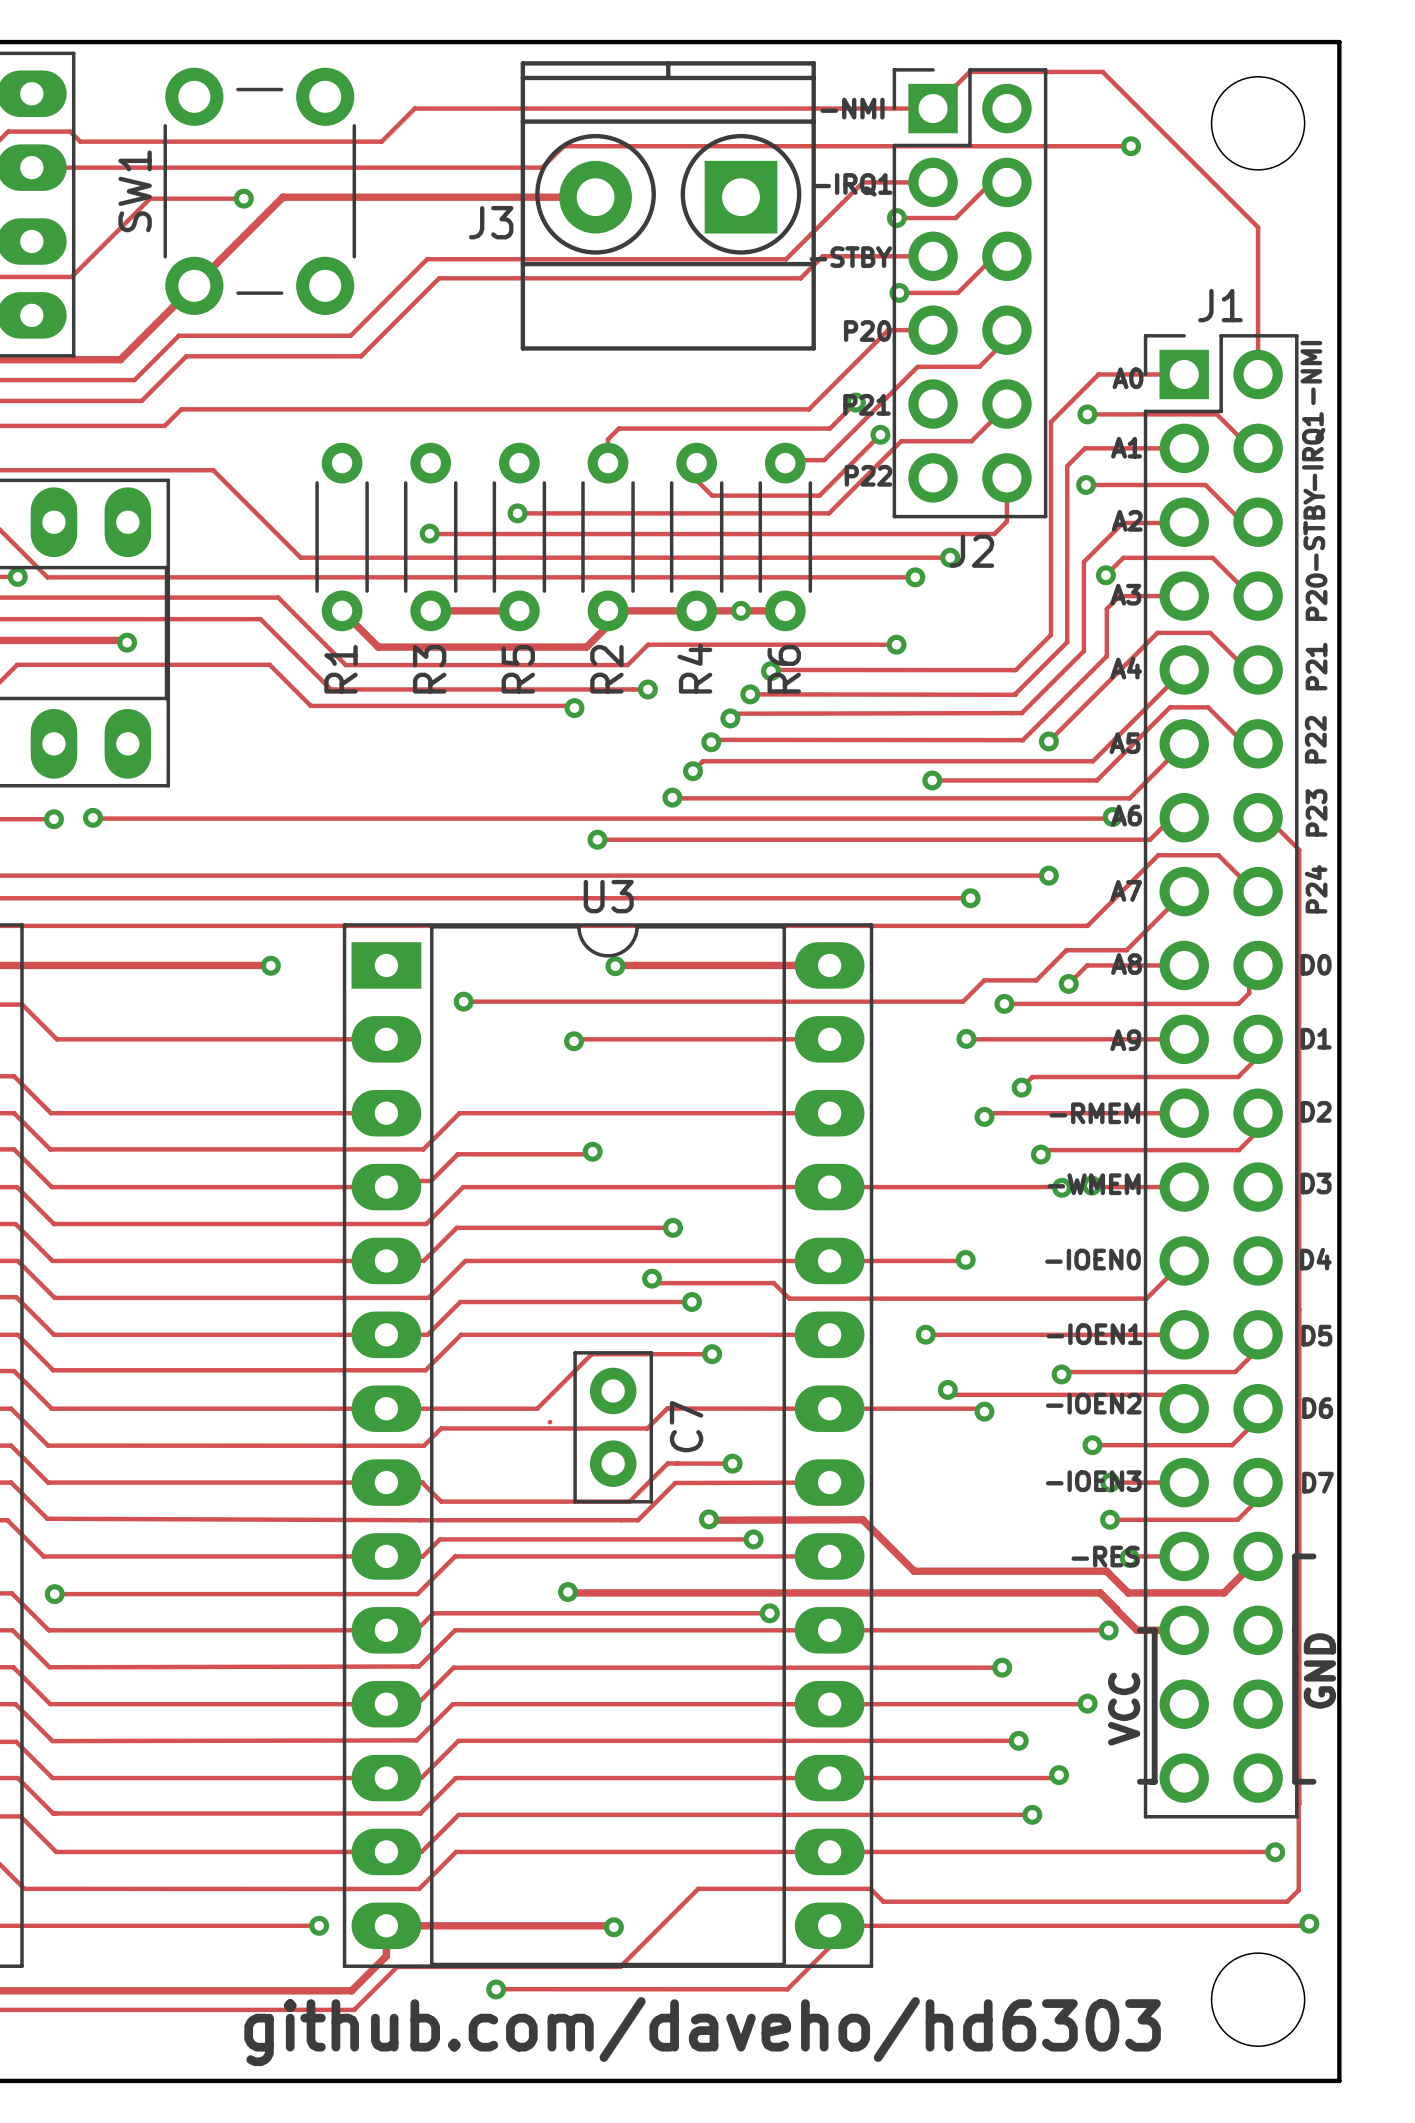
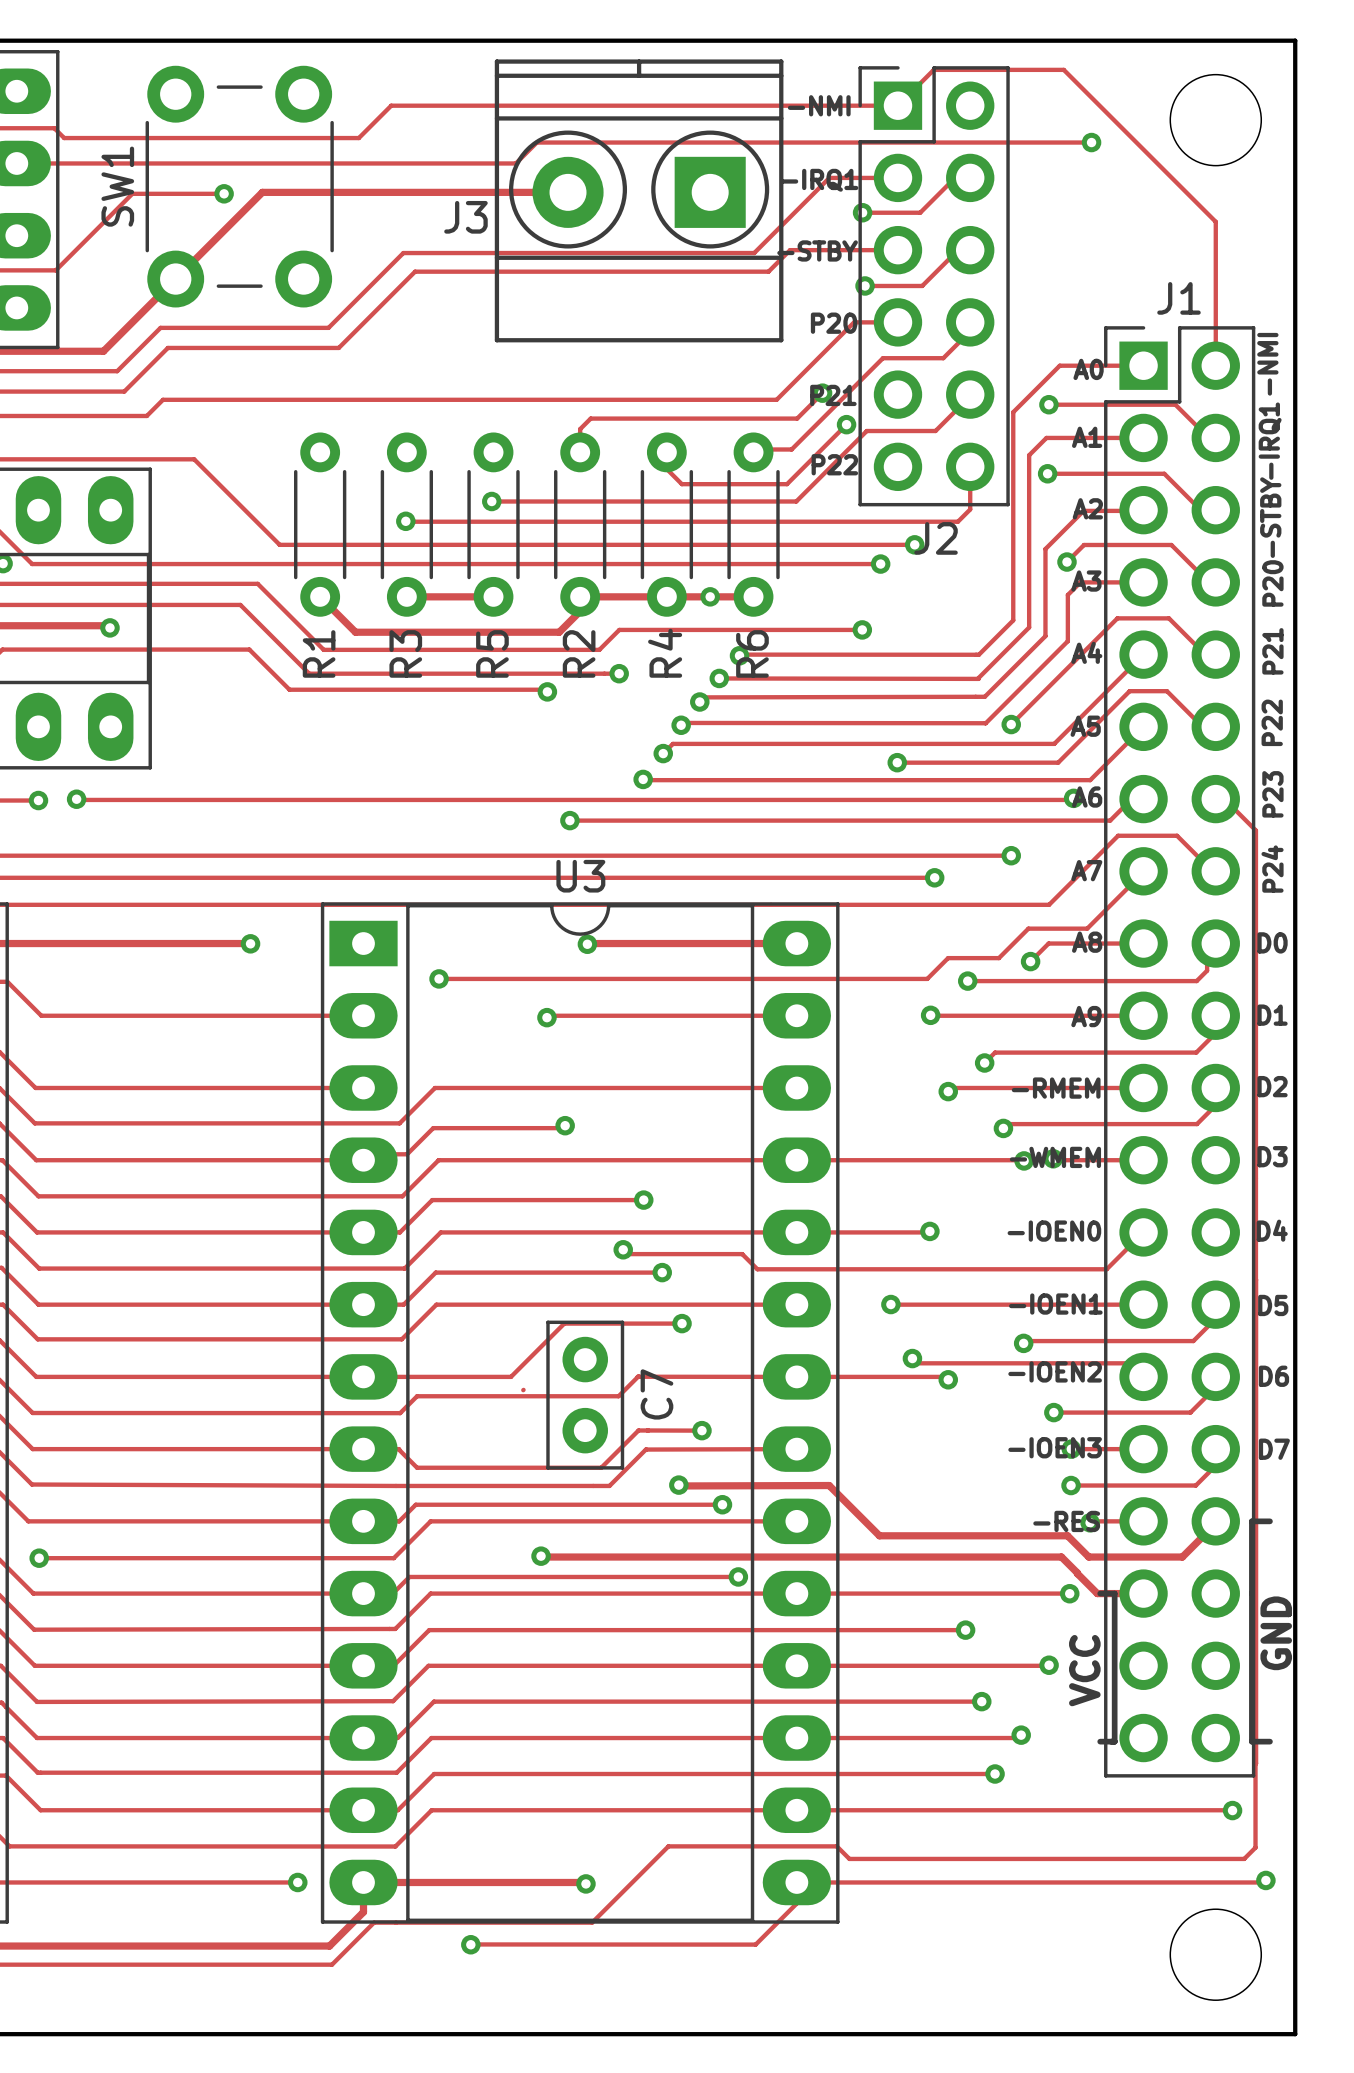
text: github.com/daveho/hd6303 (702, 2031) -> none

